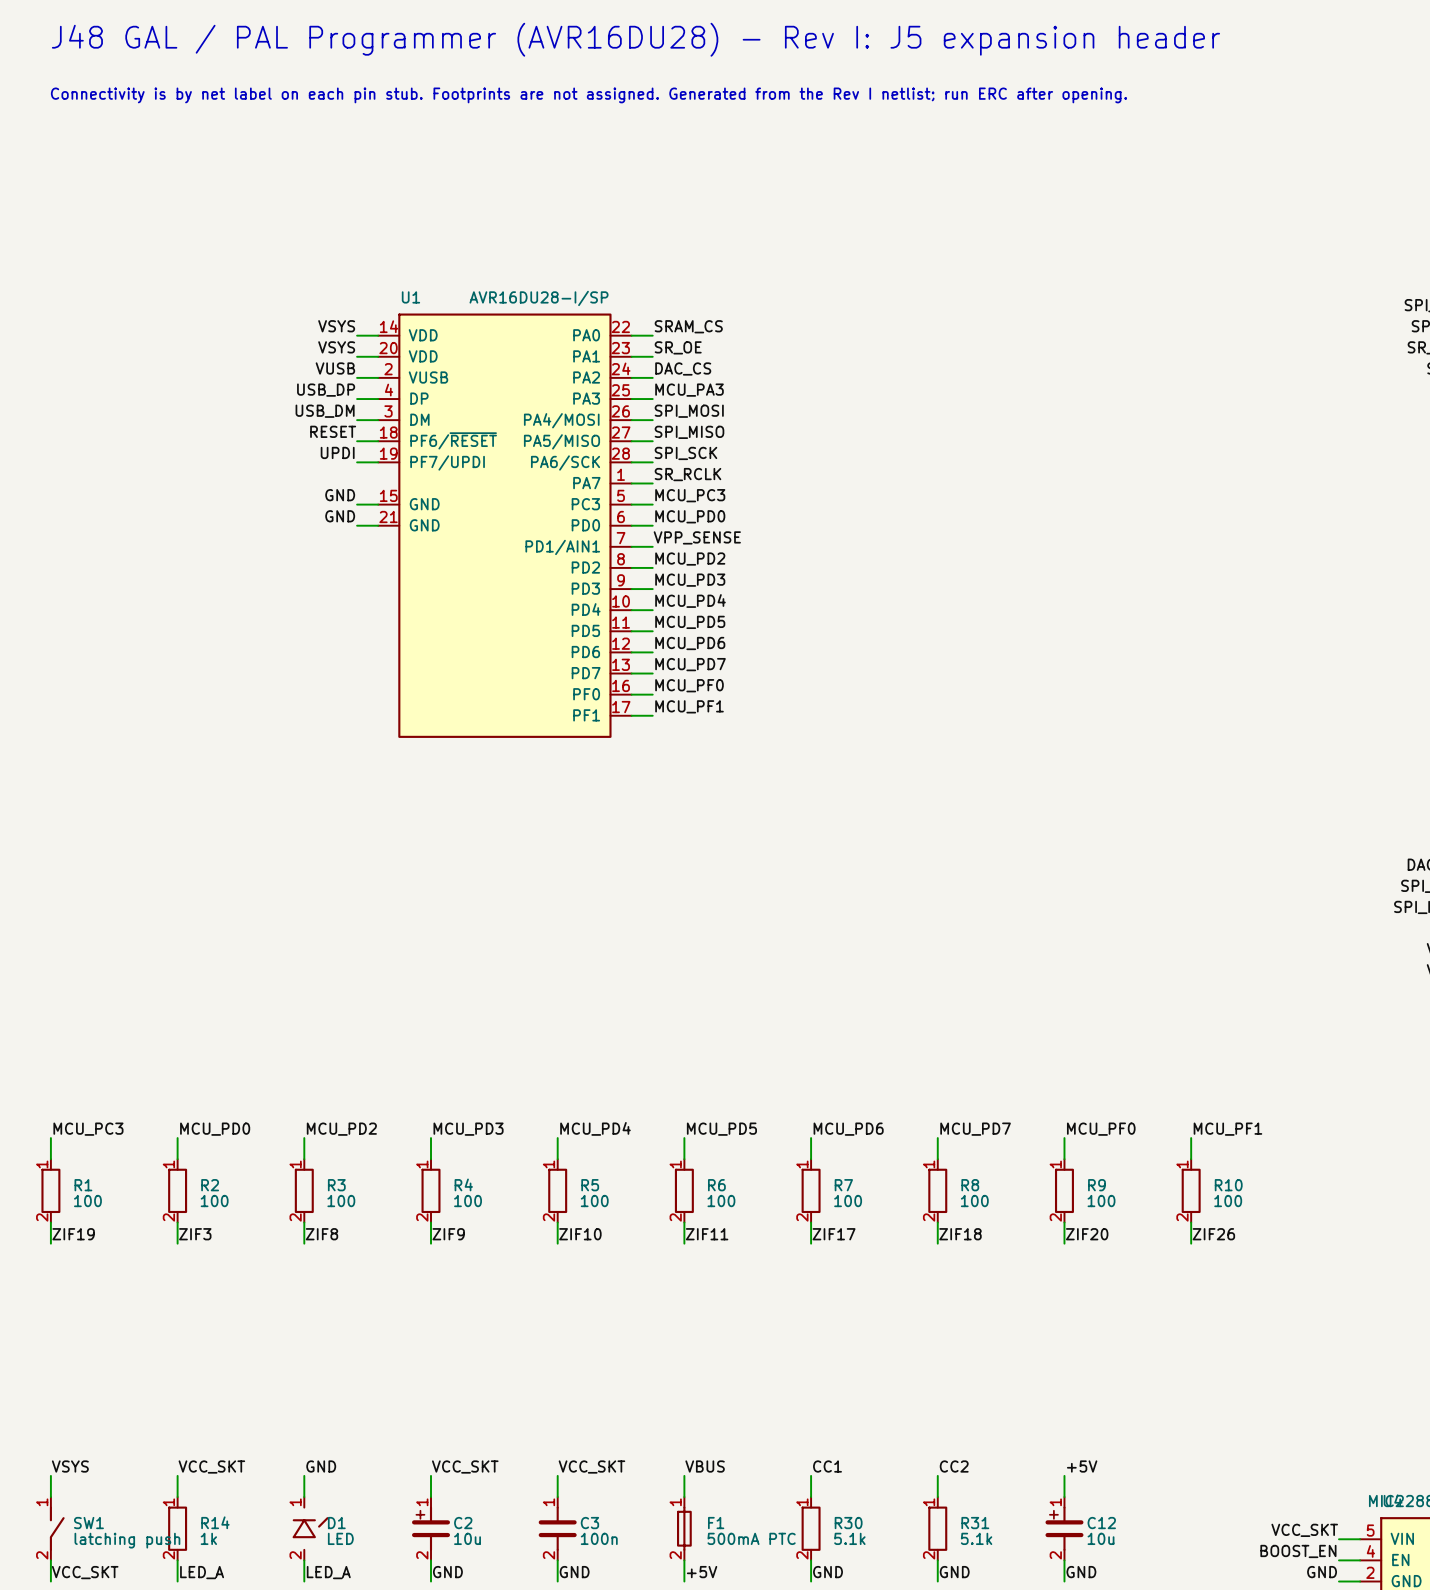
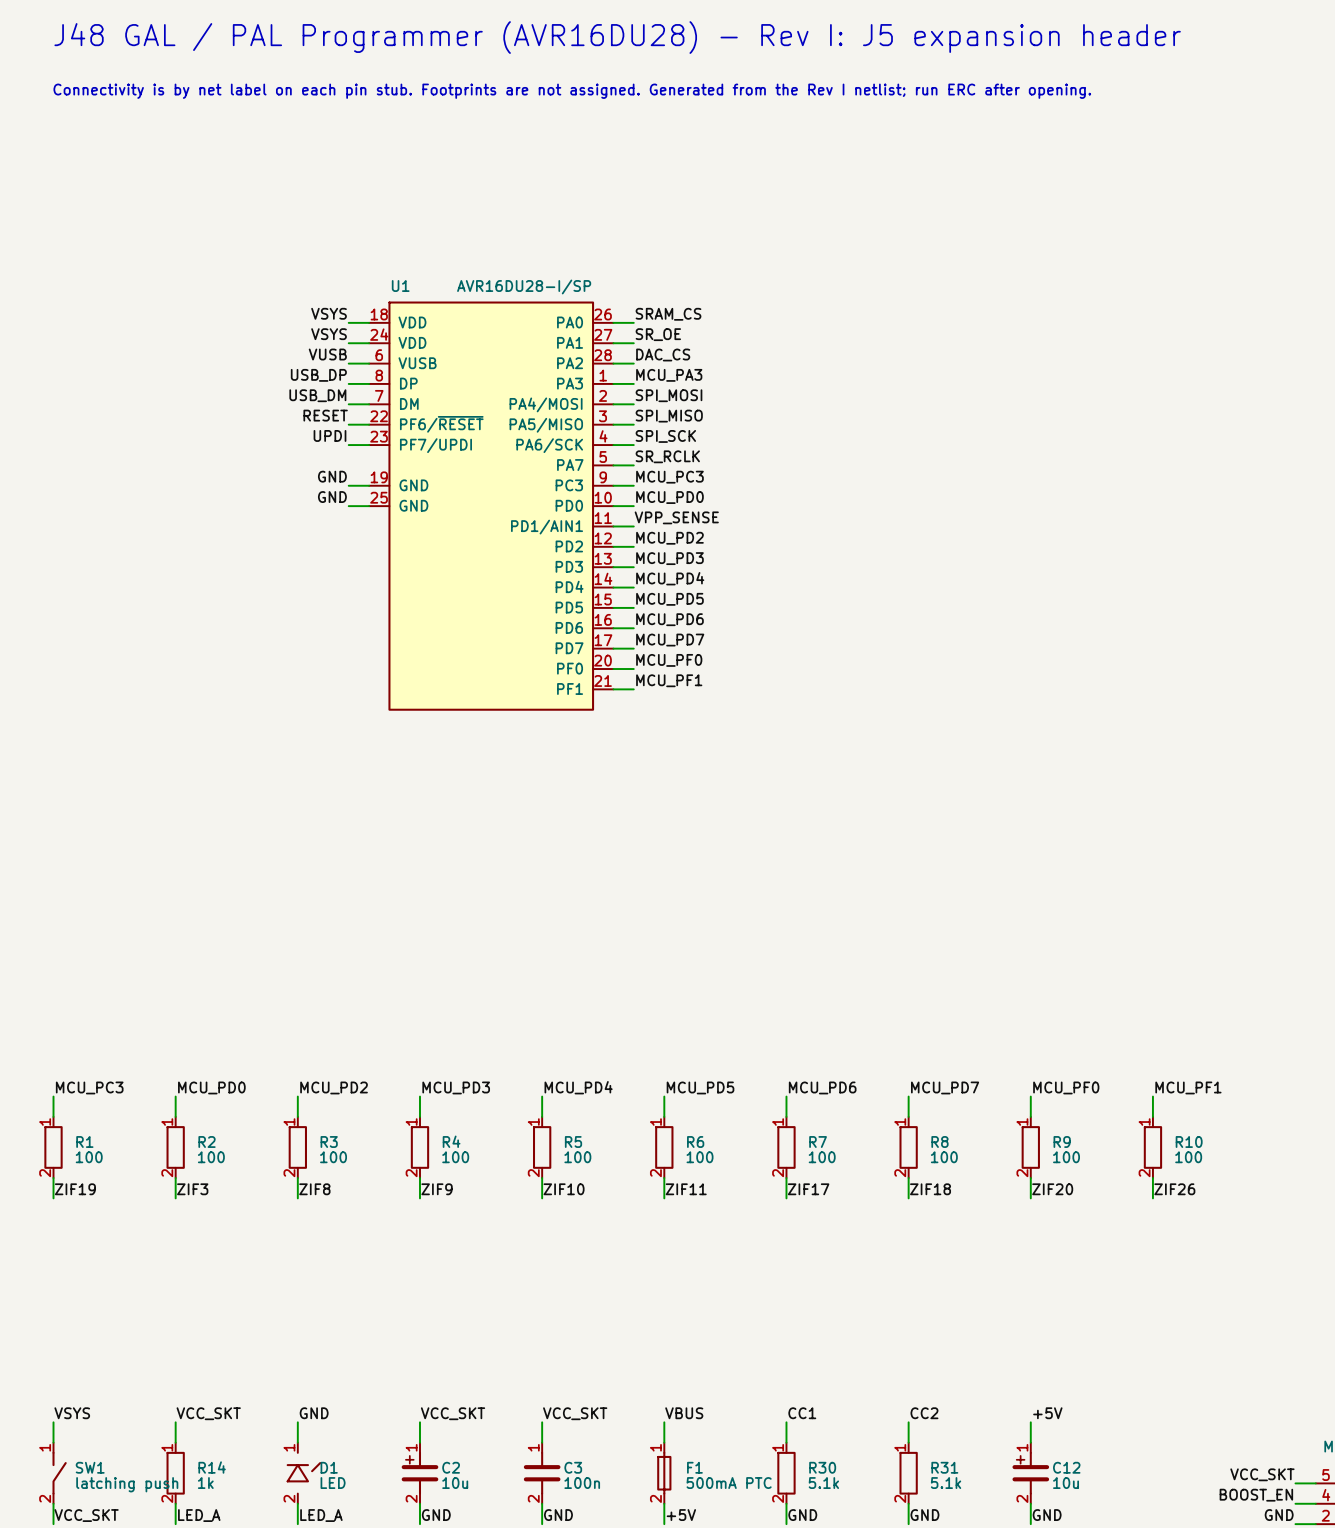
U1 symbol: [378, 313, 632, 738] -> [369, 301, 614, 711]

